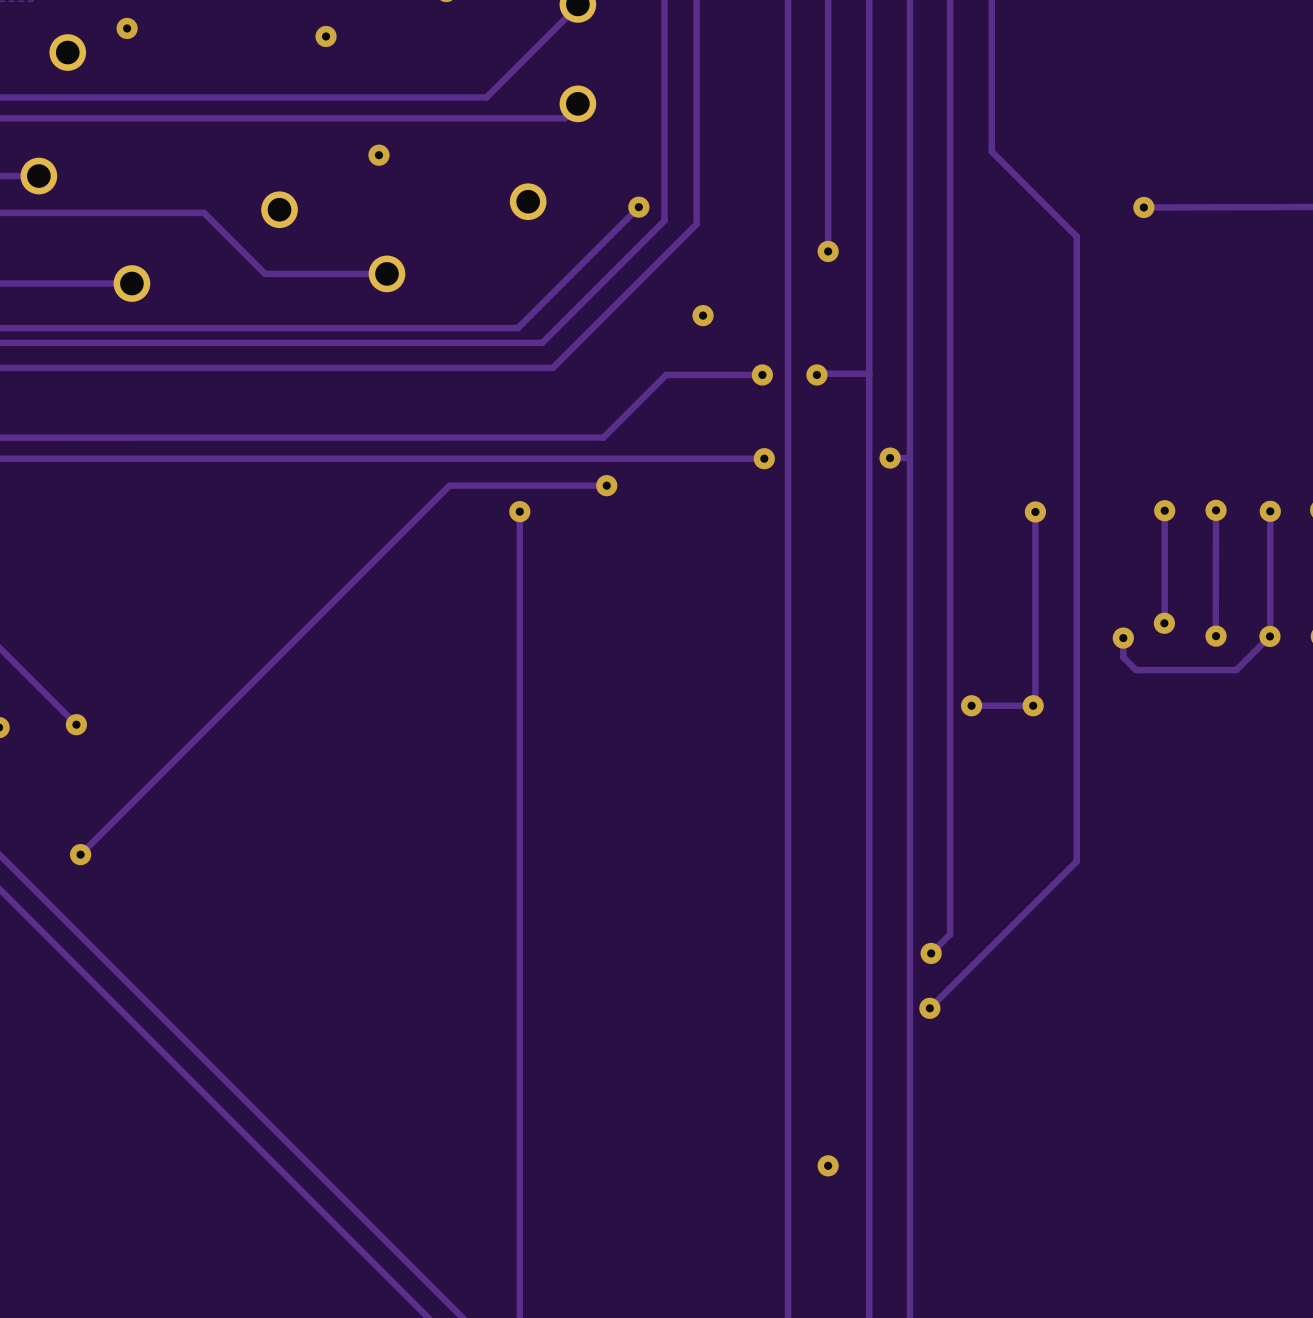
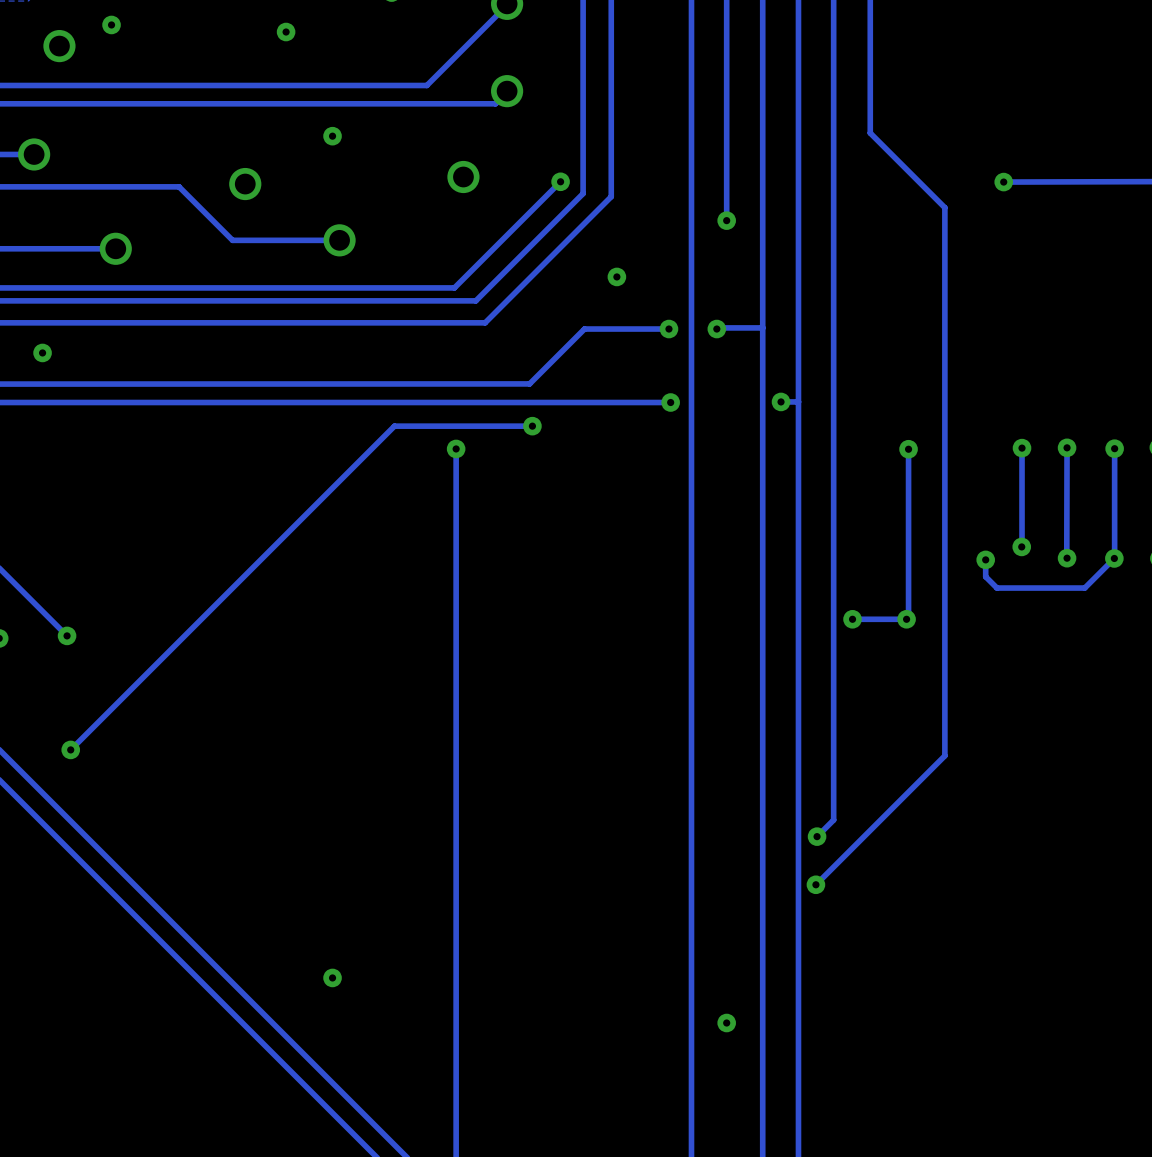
via: none -> (42, 352)
via: none -> (332, 977)

